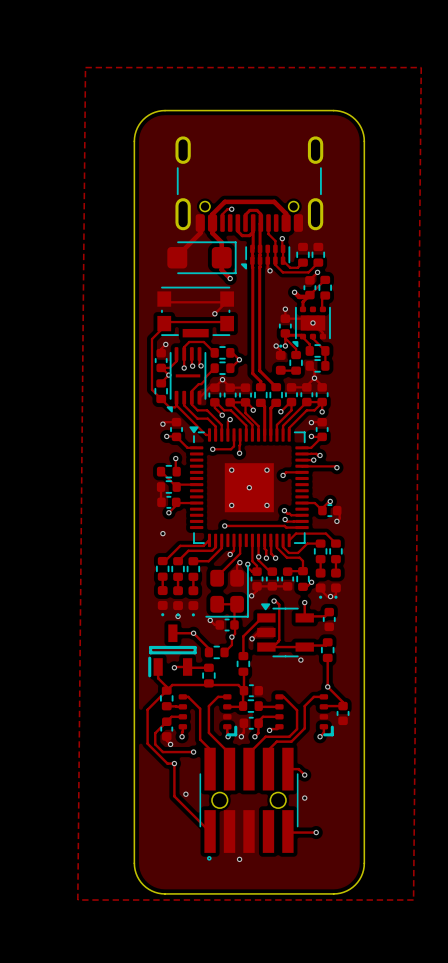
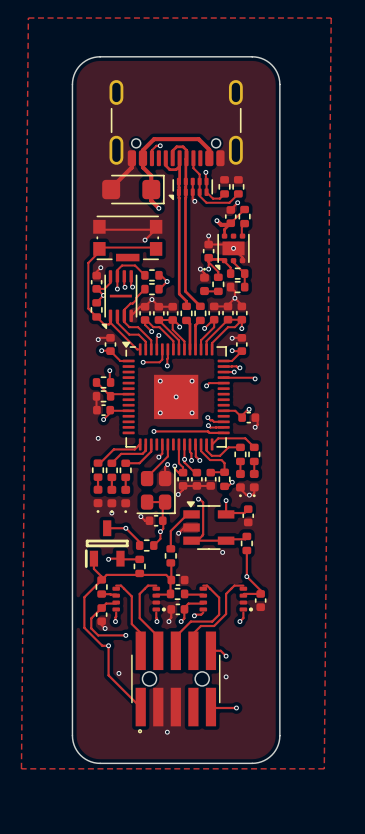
part footprint: [178, 694, 238, 737] -> [112, 586, 166, 612]
part footprint: [275, 694, 334, 737] -> [199, 586, 254, 612]

